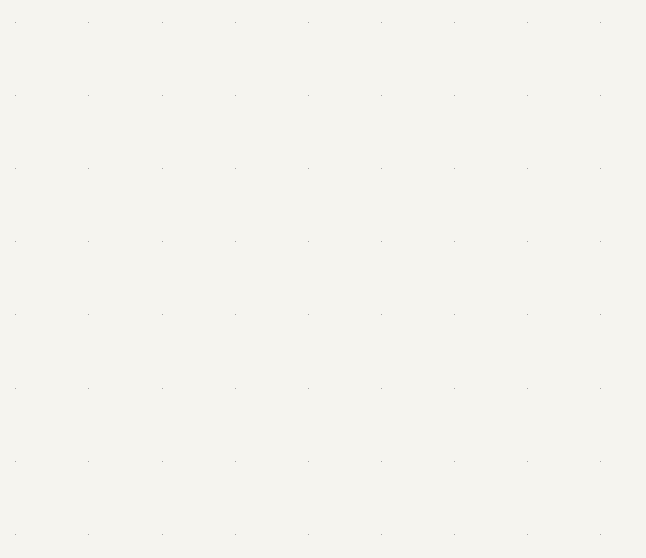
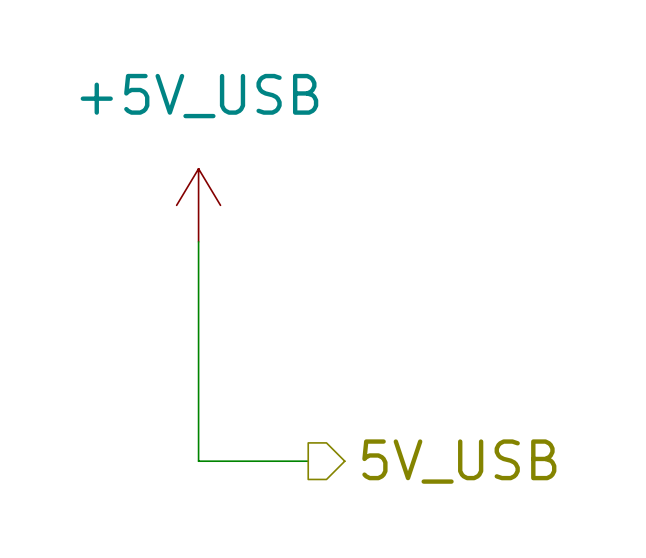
power symbol: none -> +5V_USB (198, 205)
wire: none -> (198, 241) (198, 461) (308, 461)
hierarchical label: none -> 5V_USB (459, 461)

